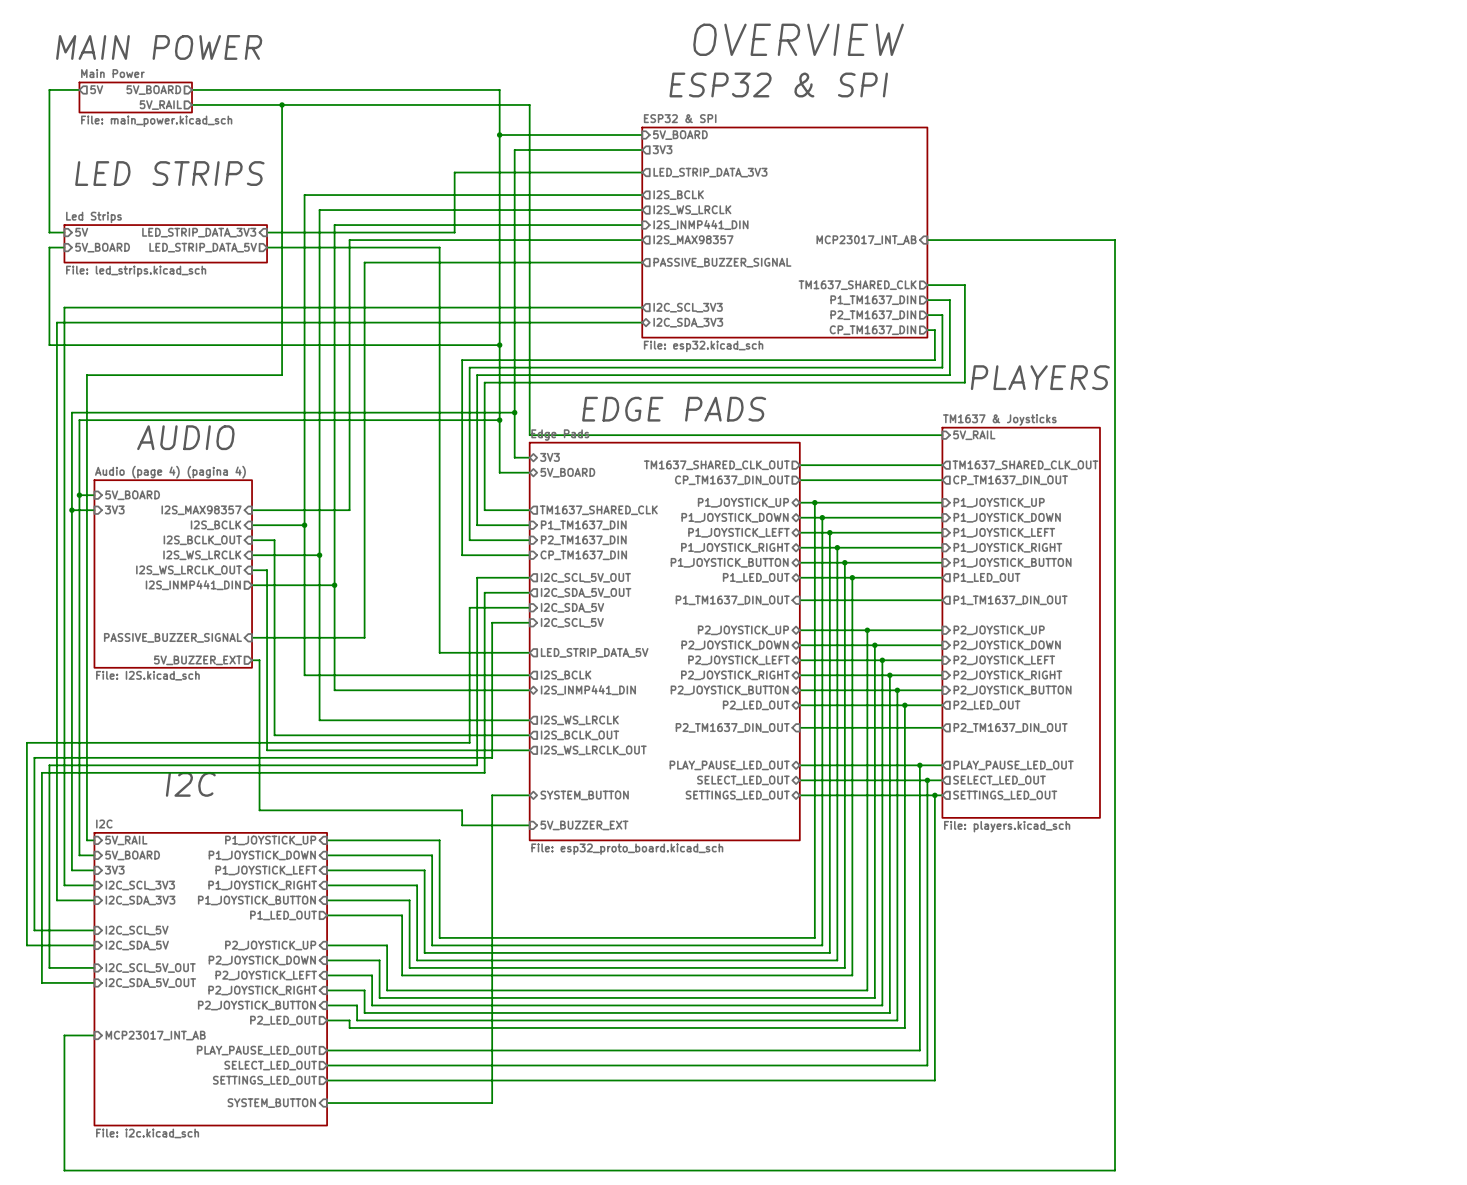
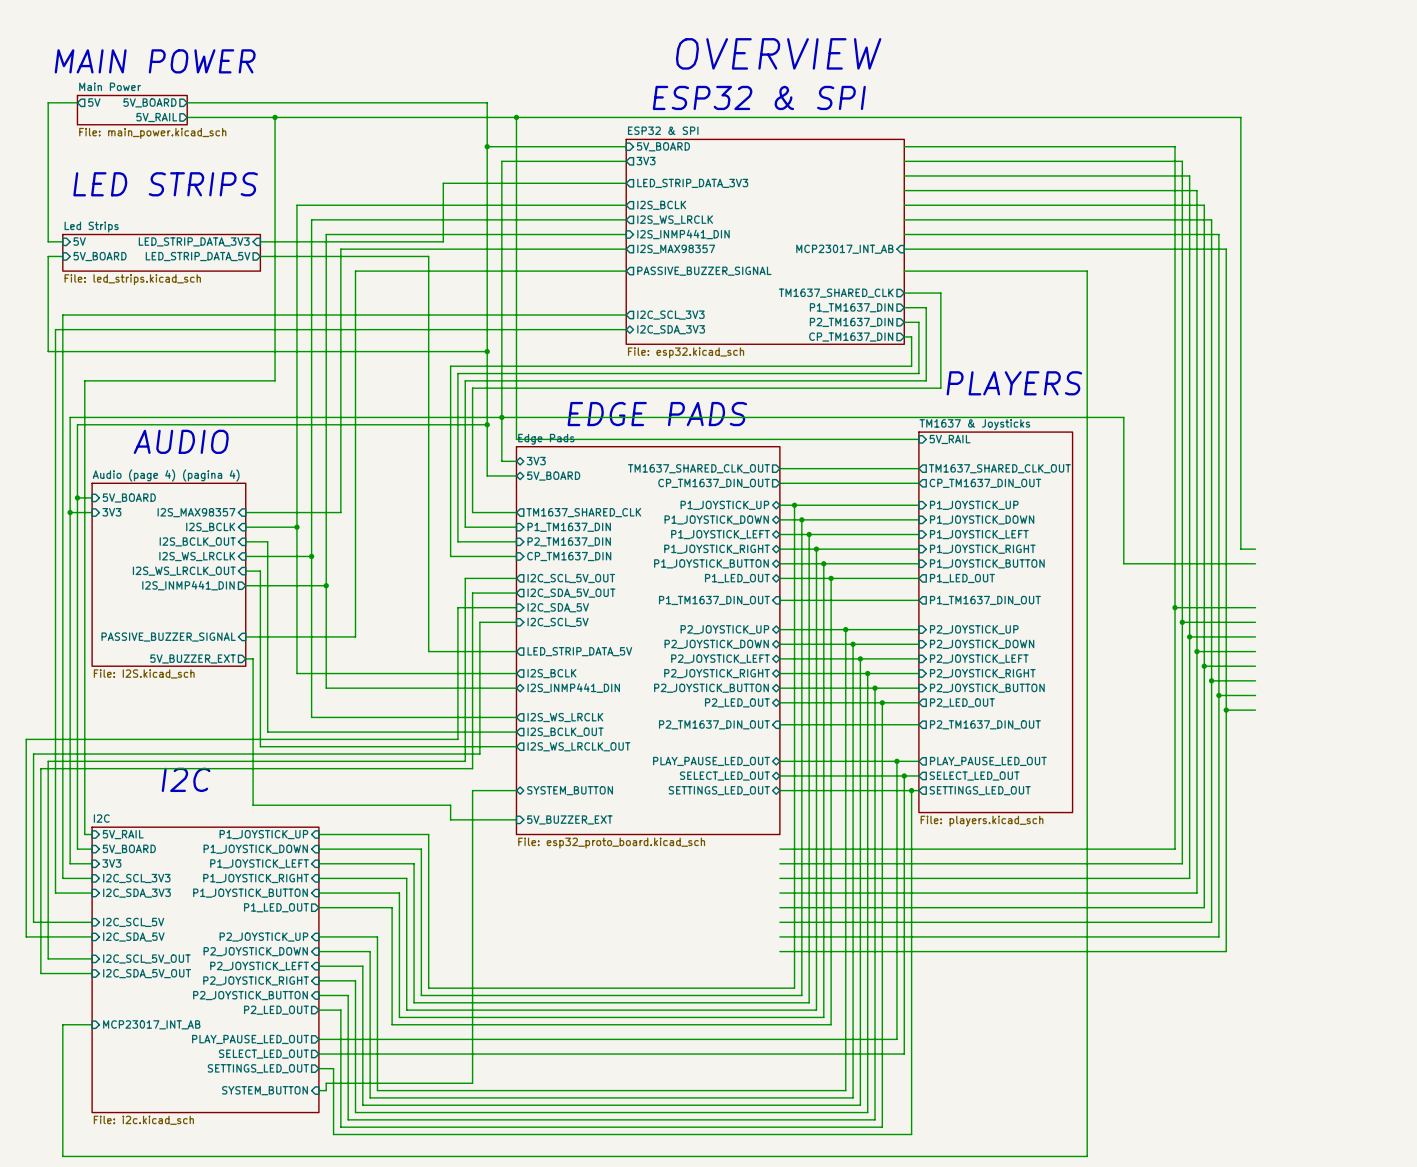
wire: none -> (516, 117) (1240, 117) (1240, 549) (1255, 549)
junction: none -> (516, 117)
wire: none -> (904, 146) (1175, 146) (1175, 849) (779, 849)
wire: none -> (904, 161) (1182, 161) (1182, 863) (779, 863)
wire: none -> (904, 175) (1189, 175) (1189, 878) (779, 878)
wire: none -> (904, 190) (1196, 190) (1196, 893) (779, 893)
wire: none -> (904, 205) (1204, 205) (1204, 907) (779, 907)
wire: none -> (904, 219) (1211, 219) (1211, 922) (779, 922)
wire: none -> (904, 234) (1218, 234) (1218, 936) (801, 936) (801, 995)
wire: (1114, 240) (1114, 262) -> (904, 271) (1087, 271)
wire: none -> (1087, 249) (1226, 249) (1226, 951) (816, 951) (816, 1010)
wire: none -> (501, 417) (1123, 417) (1123, 563) (1255, 563)
wire: none -> (1175, 607) (1255, 607)
junction: none -> (1175, 607)
wire: none -> (1182, 622) (1255, 622)
junction: none -> (1182, 622)
wire: none -> (1189, 636) (1255, 636)
junction: none -> (1189, 636)
wire: none -> (1196, 651) (1255, 651)
junction: none -> (1196, 651)
wire: none -> (1204, 666) (1255, 666)
junction: none -> (1204, 666)
wire: none -> (1211, 680) (1255, 680)
junction: none -> (1211, 680)
wire: none -> (1218, 695) (1255, 695)
junction: none -> (1218, 695)
wire: none -> (1226, 710) (1255, 710)
junction: none -> (1226, 710)
wire: (492, 795) (492, 1103) -> (479, 790) (472, 790) (472, 1083) (326, 1083) (326, 1090)
wire: (439, 937) (814, 937) -> none
wire: (432, 945) (799, 945) -> none
wire: (424, 952) (829, 952) -> none
wire: (417, 960) (799, 960) -> none
wire: (409, 967) (844, 967) -> none
wire: (402, 975) (852, 975) -> (392, 966) (392, 1024) (831, 1024) (831, 966)
wire: (387, 990) (867, 990) -> (479, 1090) (845, 1090) (845, 980)
wire: (379, 997) (439, 997) -> (428, 929) (428, 988)
wire: none -> (370, 988) (370, 1097) (853, 1097) (853, 988)
wire: (814, 997) (874, 997) -> (794, 988) (794, 929)
wire: (372, 1005) (432, 1005) -> (421, 936) (421, 995)
wire: (822, 1005) (882, 1005) -> (362, 995) (362, 1105) (860, 1105) (860, 995)
wire: (364, 1012) (424, 1012) -> (414, 944) (414, 1002)
wire: none -> (355, 1002) (355, 1112) (867, 1112) (867, 1002)
wire: (829, 1012) (889, 1012) -> (809, 1002) (809, 944)
wire: (357, 1020) (417, 1020) -> (406, 951) (406, 1010)
wire: (837, 1020) (897, 1020) -> (348, 1010) (348, 1119) (875, 1119) (875, 1010)
wire: (349, 1027) (409, 1027) -> (399, 958) (399, 1017)
wire: none -> (340, 1017) (340, 1127) (882, 1127) (882, 1017)
wire: (844, 1027) (904, 1027) -> (823, 1017) (823, 958)
wire: (342, 1080) (934, 1080) -> (333, 1068) (333, 1134) (911, 1134) (911, 1068)
wire: (334, 1103) (387, 1103) -> (377, 980) (377, 1090)

